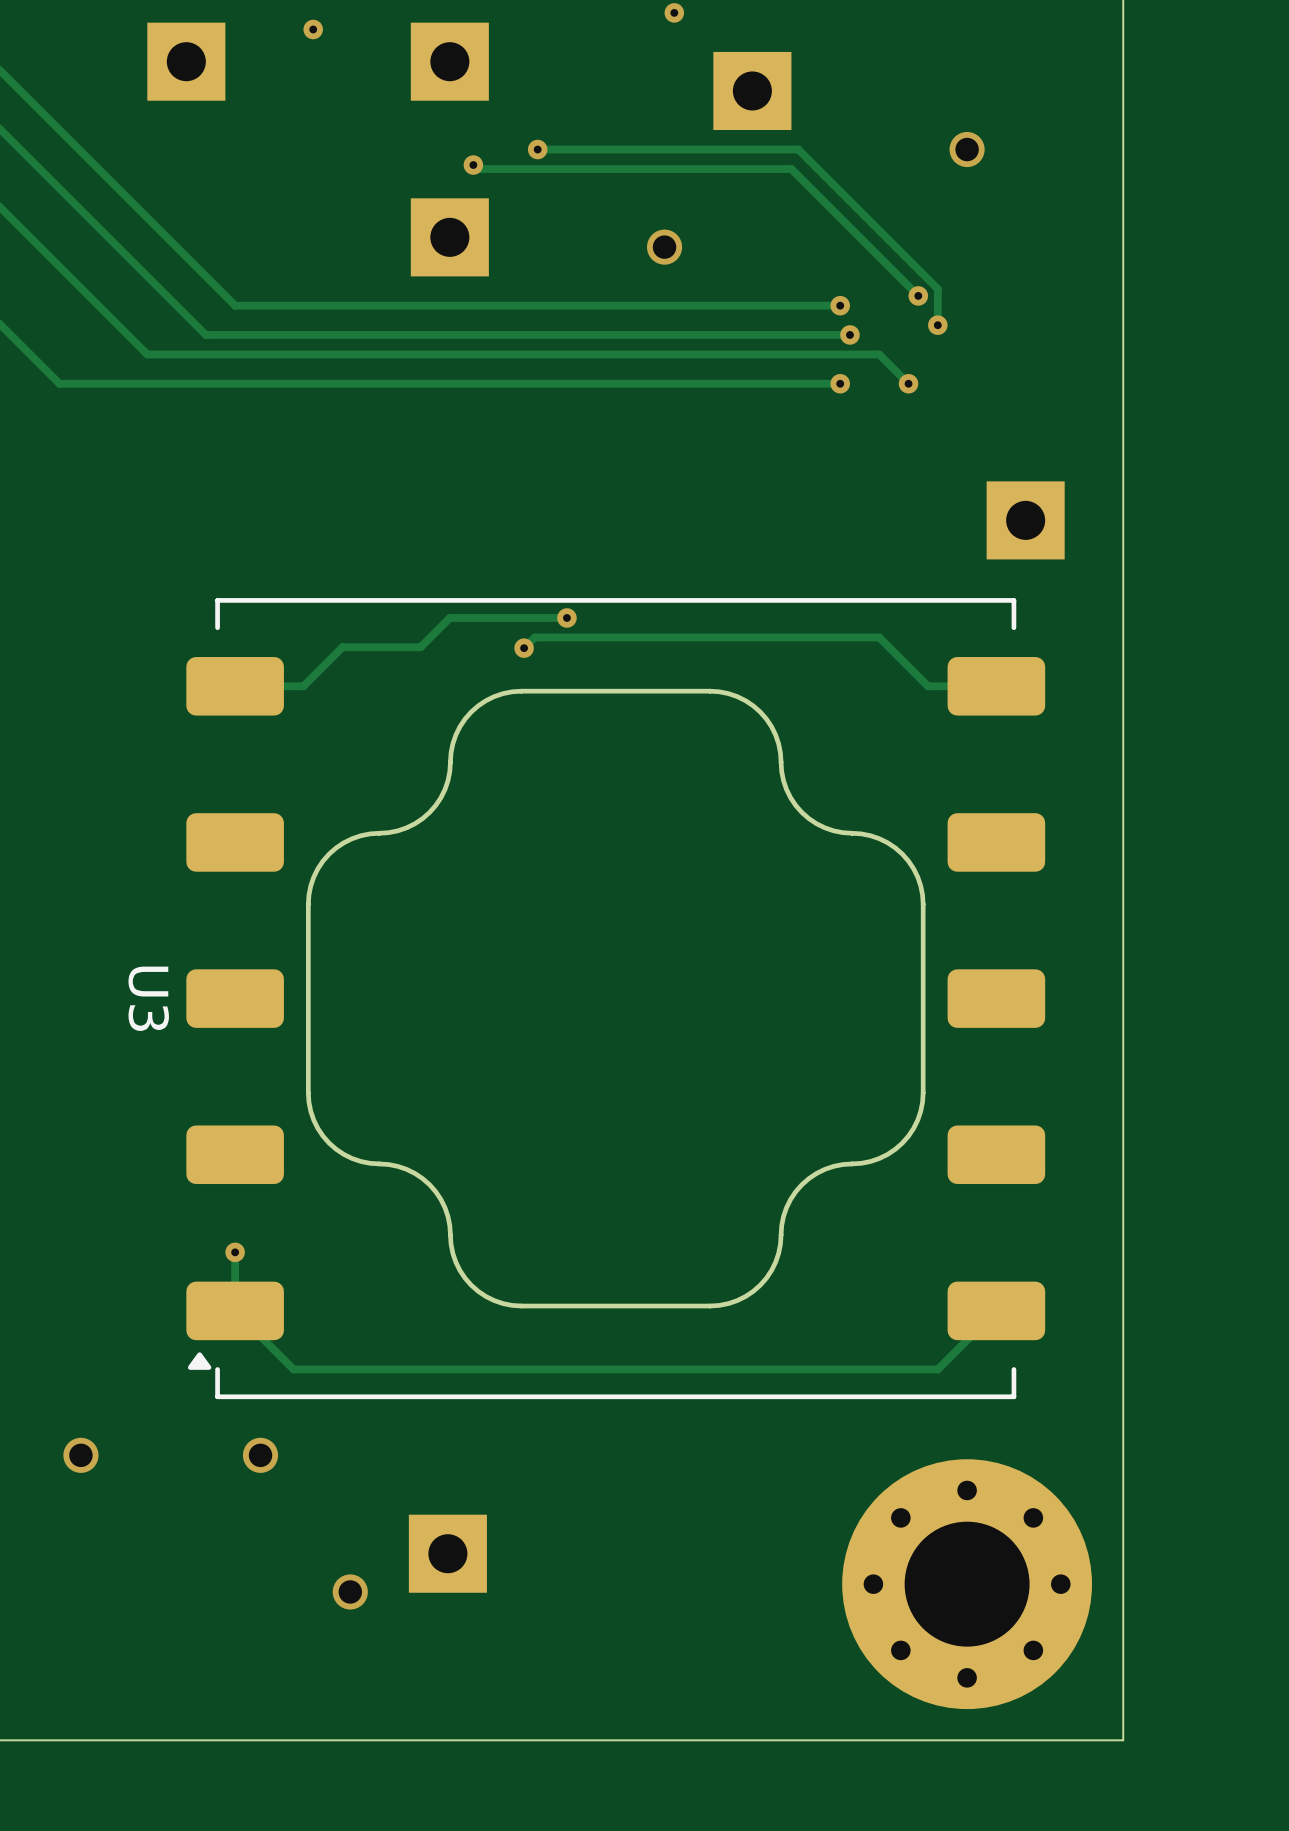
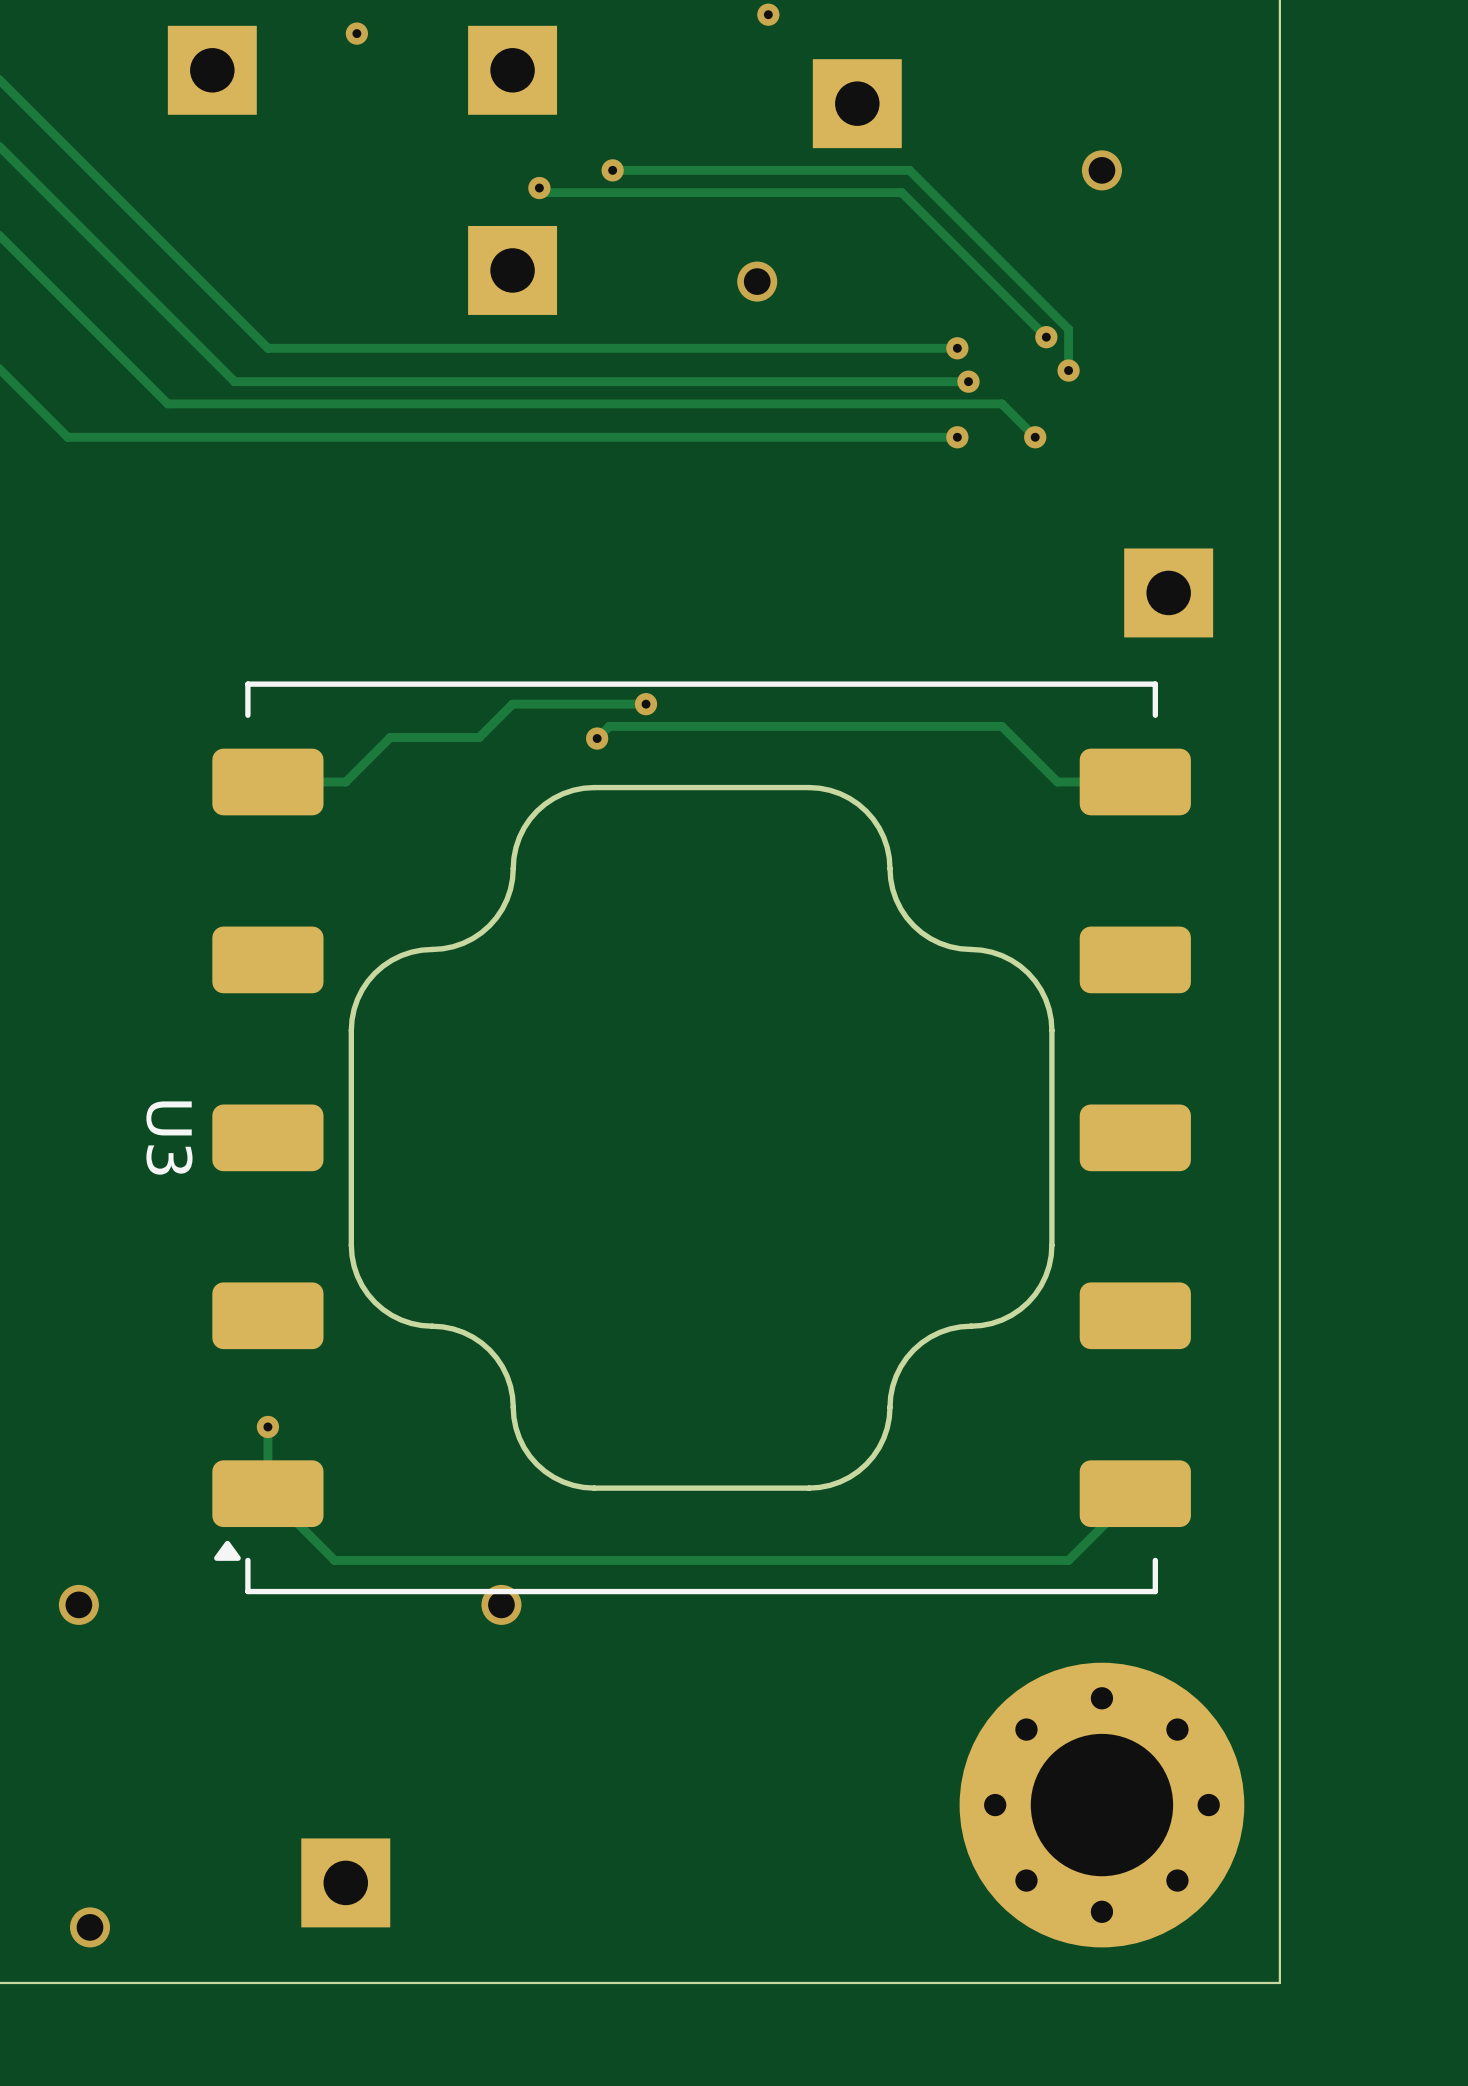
via: none -> (501, 1604)
via position: (80, 1455) -> (78, 1604)
via: (260, 1455) -> none
part position: (447, 1553) -> (345, 1882)
via: (350, 1591) -> none
via: none -> (90, 1927)

